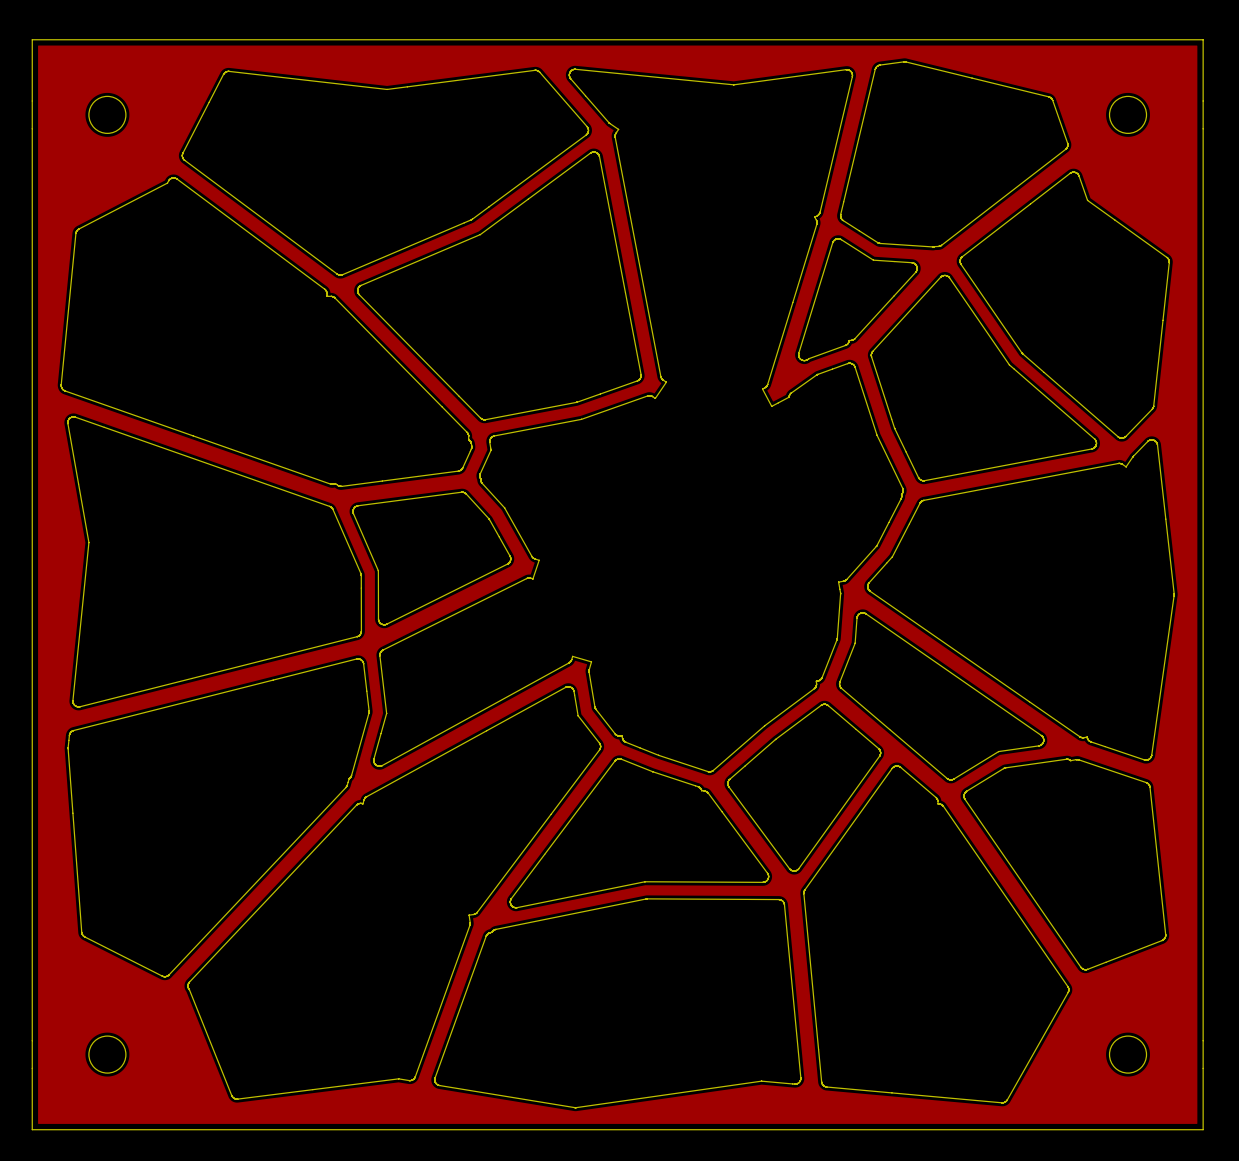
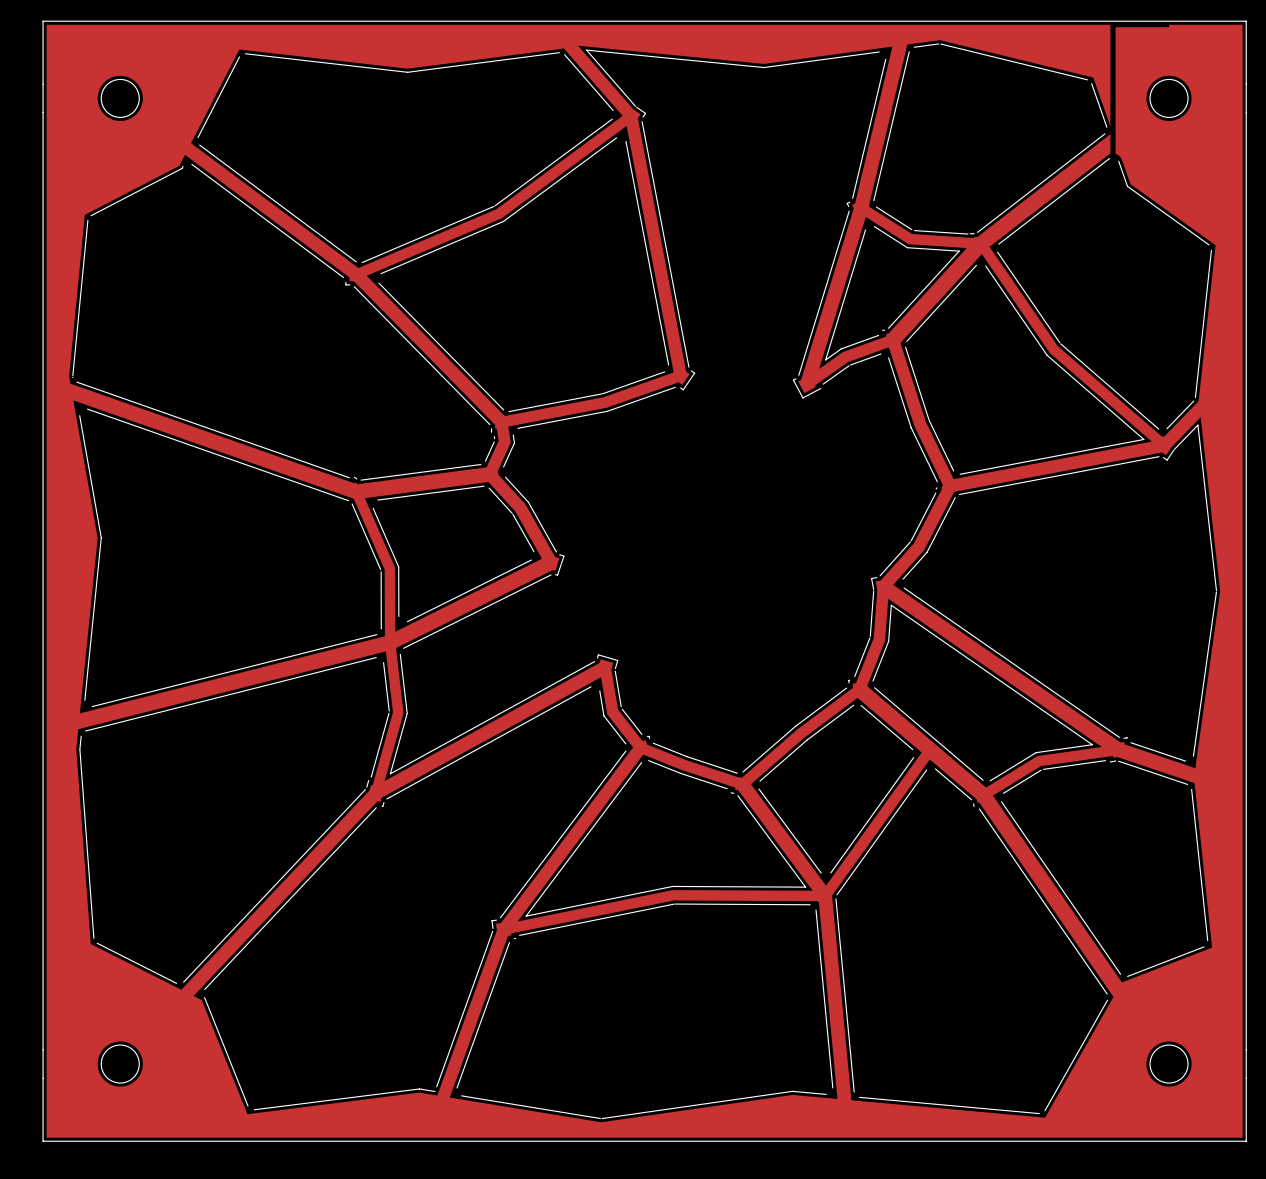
drawing: none -> [191, 24, 434, 362]
drawing: none -> [825, 24, 1111, 1138]
drawing shape: [38, 45, 108, 1124] -> [46, 24, 121, 1138]
drawing shape: [107, 45, 186, 211] -> [120, 24, 192, 197]
drawing: [185, 45, 390, 140] -> none
drawing shape: [389, 45, 722, 644] -> [433, 24, 735, 630]
drawing shape: [721, 45, 794, 82] -> [734, 24, 826, 64]
drawing: [793, 45, 1077, 1124] -> none
drawing shape: [1128, 45, 1198, 1124] -> [1169, 24, 1243, 1138]
board edge: none -> (601, 51) (586, 50) (596, 61)
drawing: [185, 165, 390, 349] -> none
board edge: none -> (946, 250) (959, 251) (950, 260)
drawing shape: [767, 312, 794, 402] -> [798, 300, 826, 394]
board edge: none -> (830, 343) (825, 359) (839, 349)
drawing shape: [1076, 404, 1129, 469] -> [1110, 391, 1170, 463]
drawing: none -> [191, 425, 434, 1138]
drawing: [185, 437, 390, 1124] -> none
board edge: none -> (1134, 431) (1143, 439) (1131, 441)
board edge: none -> (1189, 434) (1197, 425) (1199, 437)
board edge: none -> (899, 611) (891, 605) (890, 615)
drawing shape: [389, 660, 722, 1124] -> [433, 659, 735, 1138]
drawing shape: [721, 708, 794, 962] -> [734, 708, 826, 973]
board edge: none -> (1079, 736) (1092, 744) (1077, 746)
drawing shape: [1076, 738, 1129, 773] -> [1110, 735, 1170, 775]
board edge: none -> (394, 760) (390, 773) (402, 767)
board edge: none -> (798, 877) (805, 887) (793, 887)
board edge: none -> (535, 903) (526, 916) (541, 913)
drawing shape: [107, 952, 186, 1124] -> [120, 958, 192, 1138]
drawing shape: [1076, 957, 1129, 1124] -> [1110, 964, 1170, 1138]
drawing shape: [721, 1084, 794, 1124] -> [734, 1094, 826, 1138]

